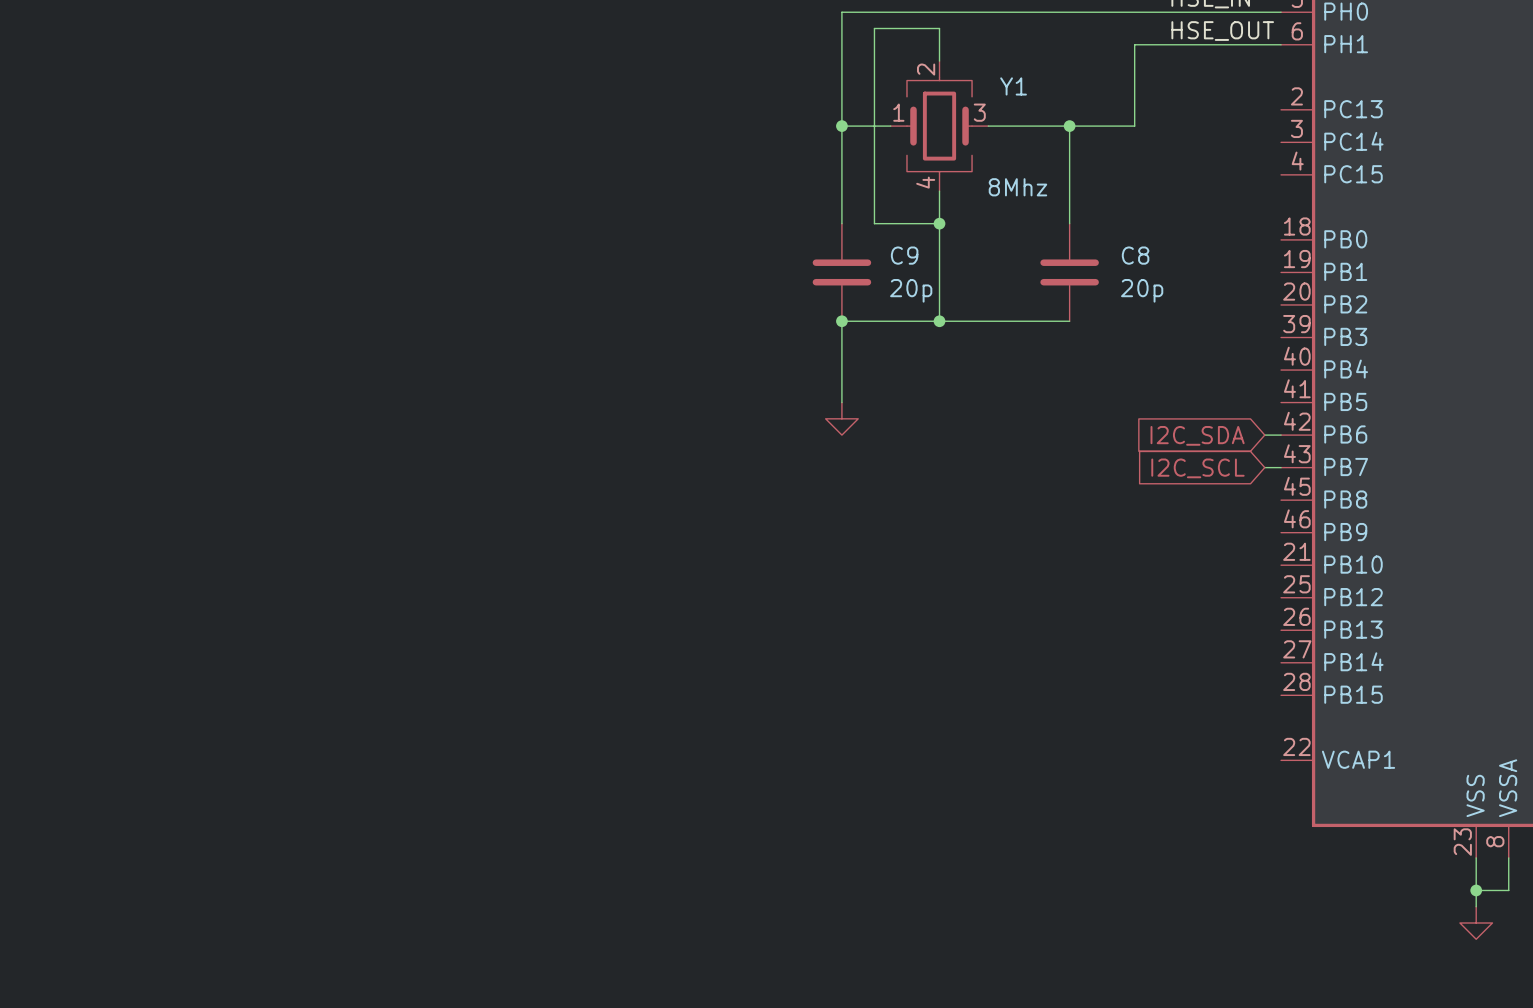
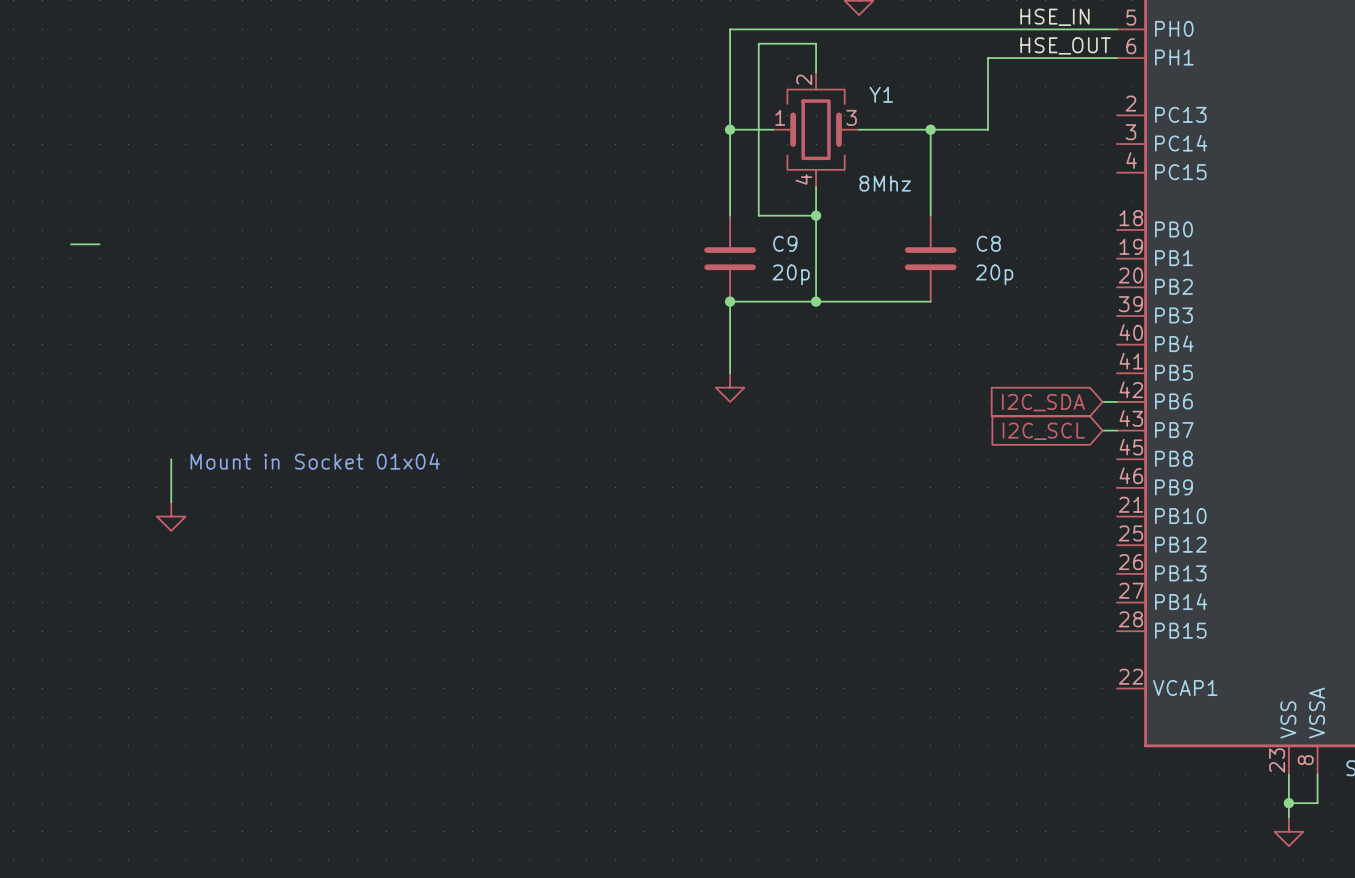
wire: none -> (70, 244) (99, 244)
wire: none -> (171, 459) (171, 502)
text: none -> Mount in Socket 01x04 (315, 461)
power symbol: none -> (171, 516)

